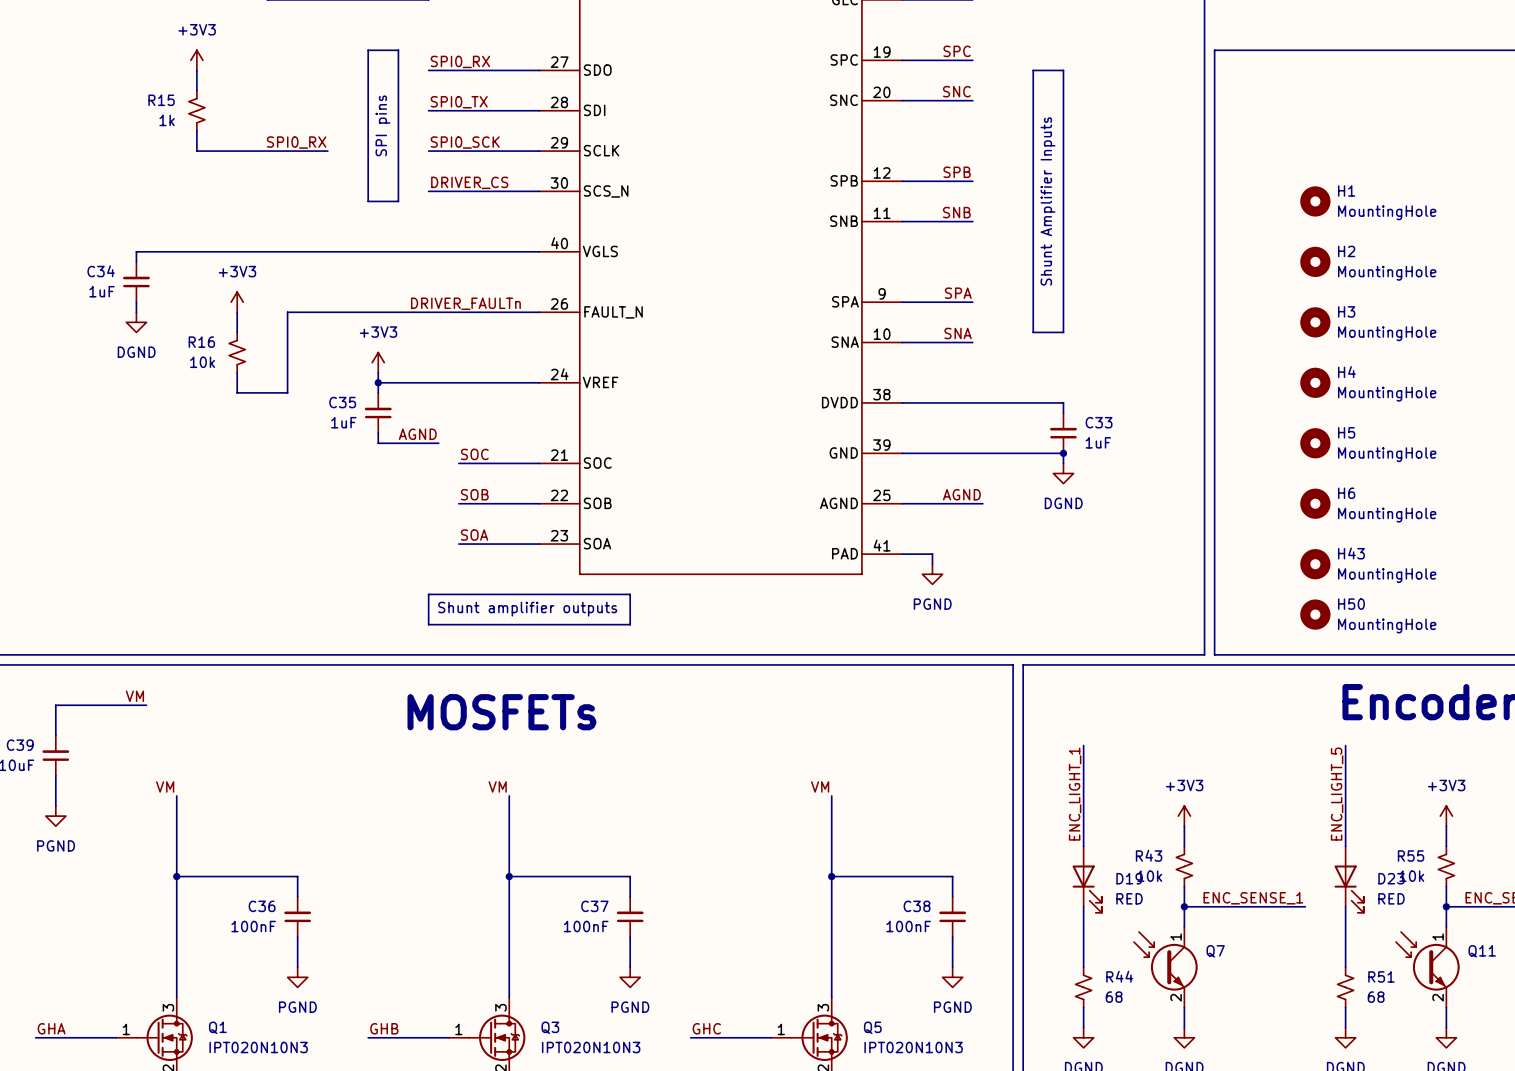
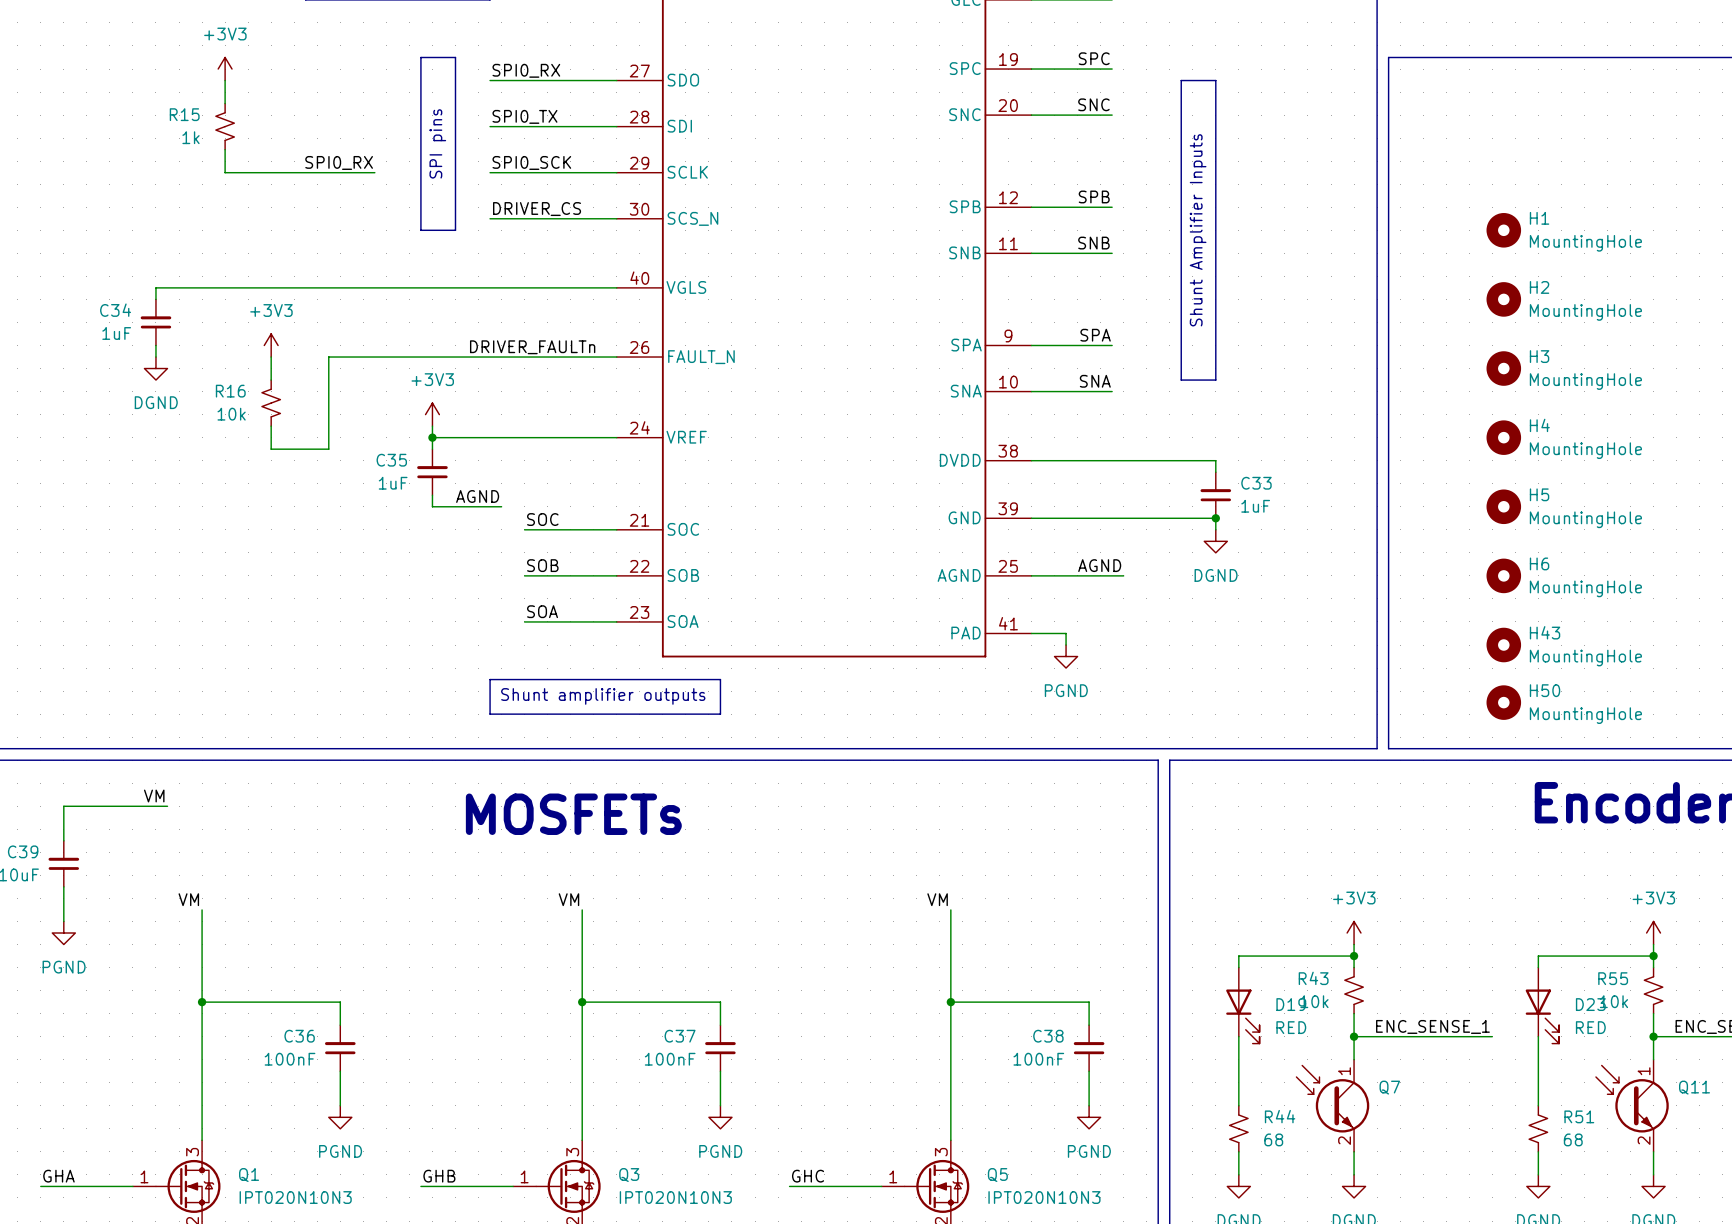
wire: (1083, 745) (1083, 836) -> (1354, 956) (1238, 956)
wire: (1345, 745) (1345, 836) -> (1653, 956) (1538, 956)
label: ENC_LIGHT_1 (1075, 794) -> none
label: ENC_LIGHT_5 (1337, 794) -> none
junction: none -> (1354, 956)
junction: none -> (1653, 956)

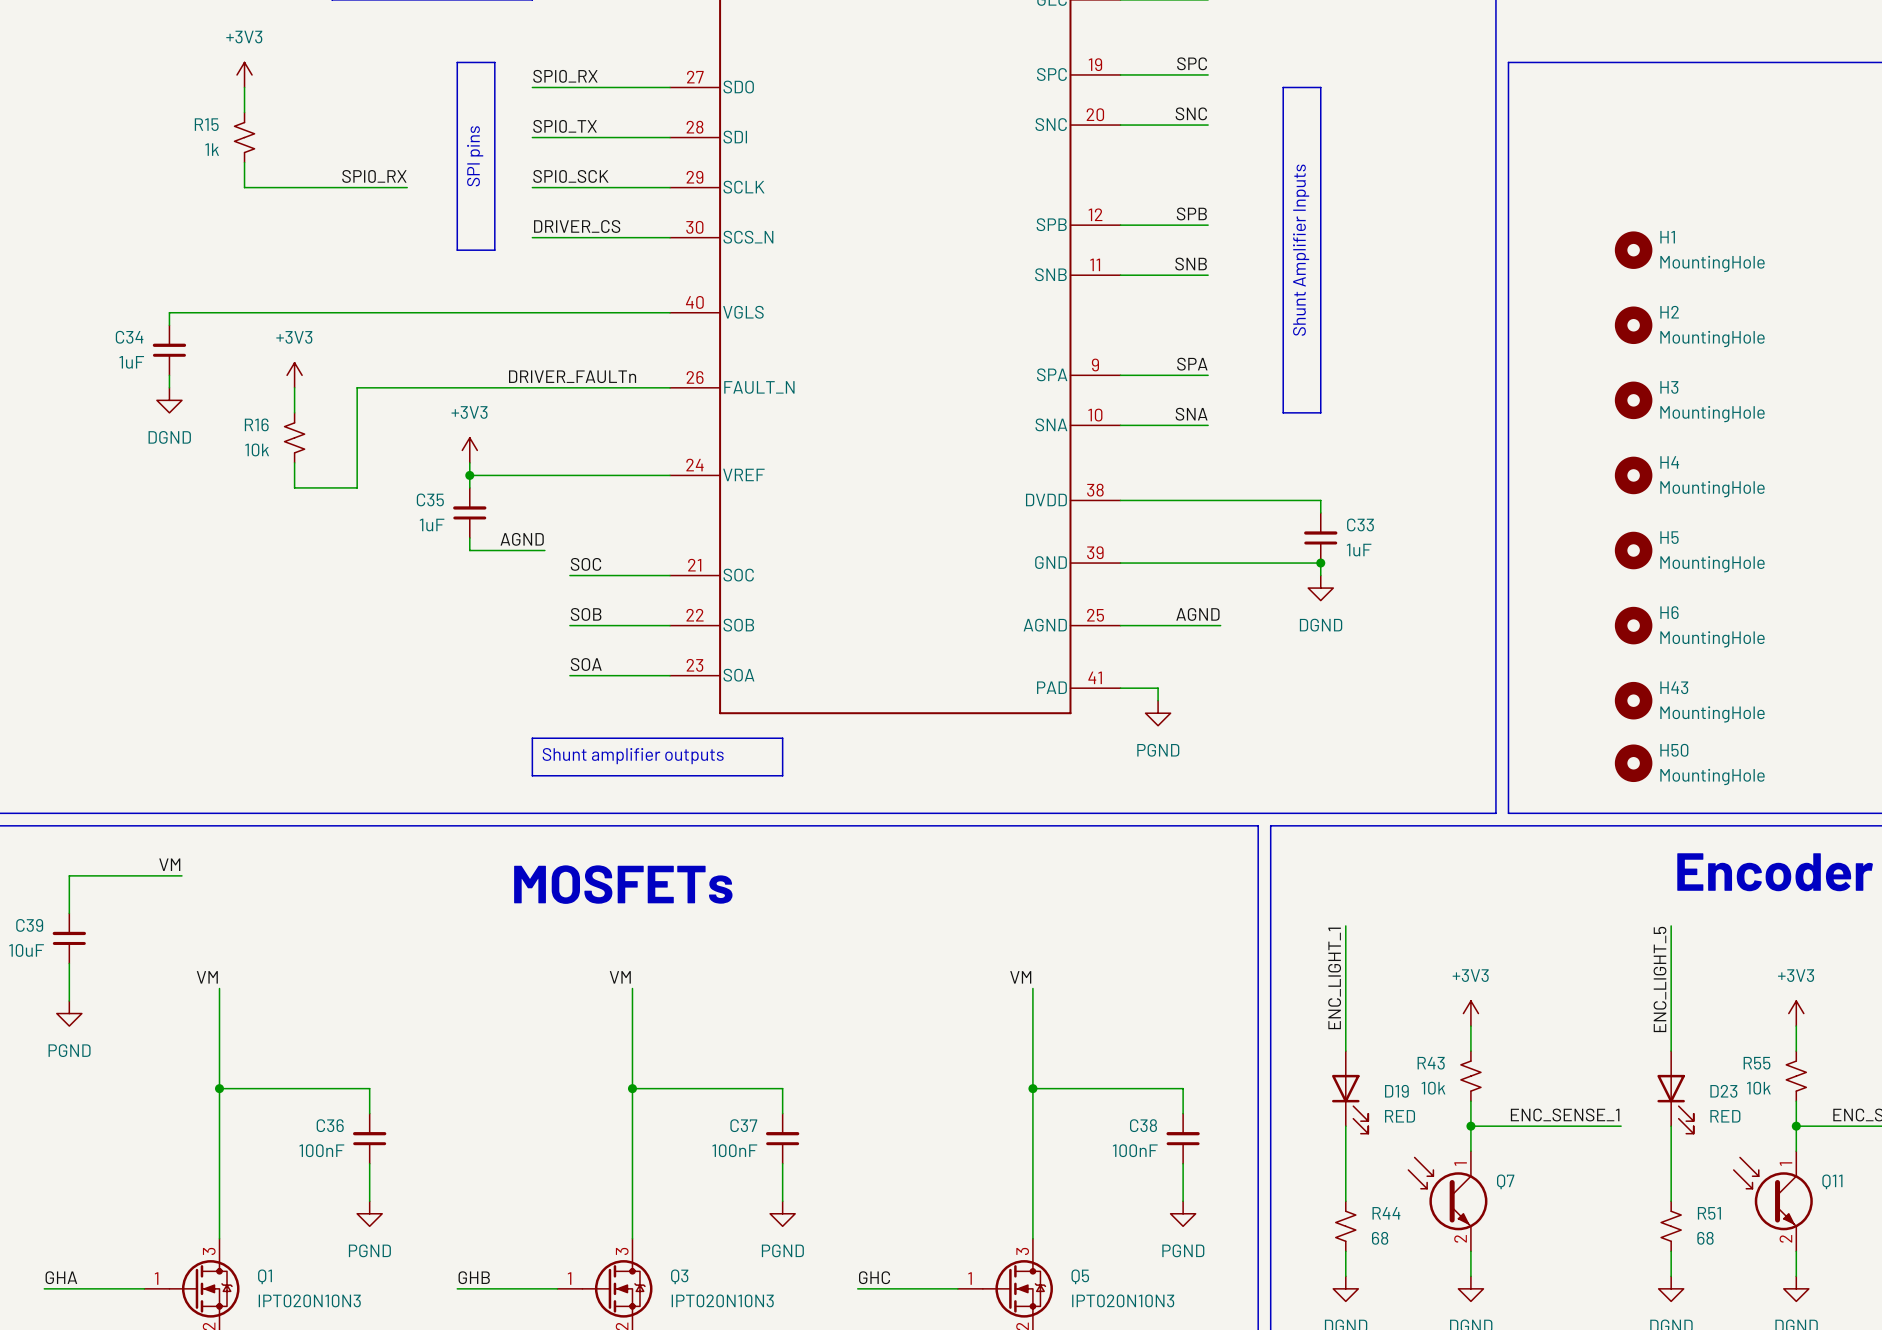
label: none -> ENC_LIGHT_1 (1334, 978)
label: none -> ENC_LIGHT_5 (1660, 979)
wire: (1238, 956) (1354, 956) -> (1345, 1038) (1345, 925)
junction: (1354, 956) -> none
wire: (1538, 956) (1653, 956) -> (1671, 1038) (1671, 925)
junction: (1653, 956) -> none

